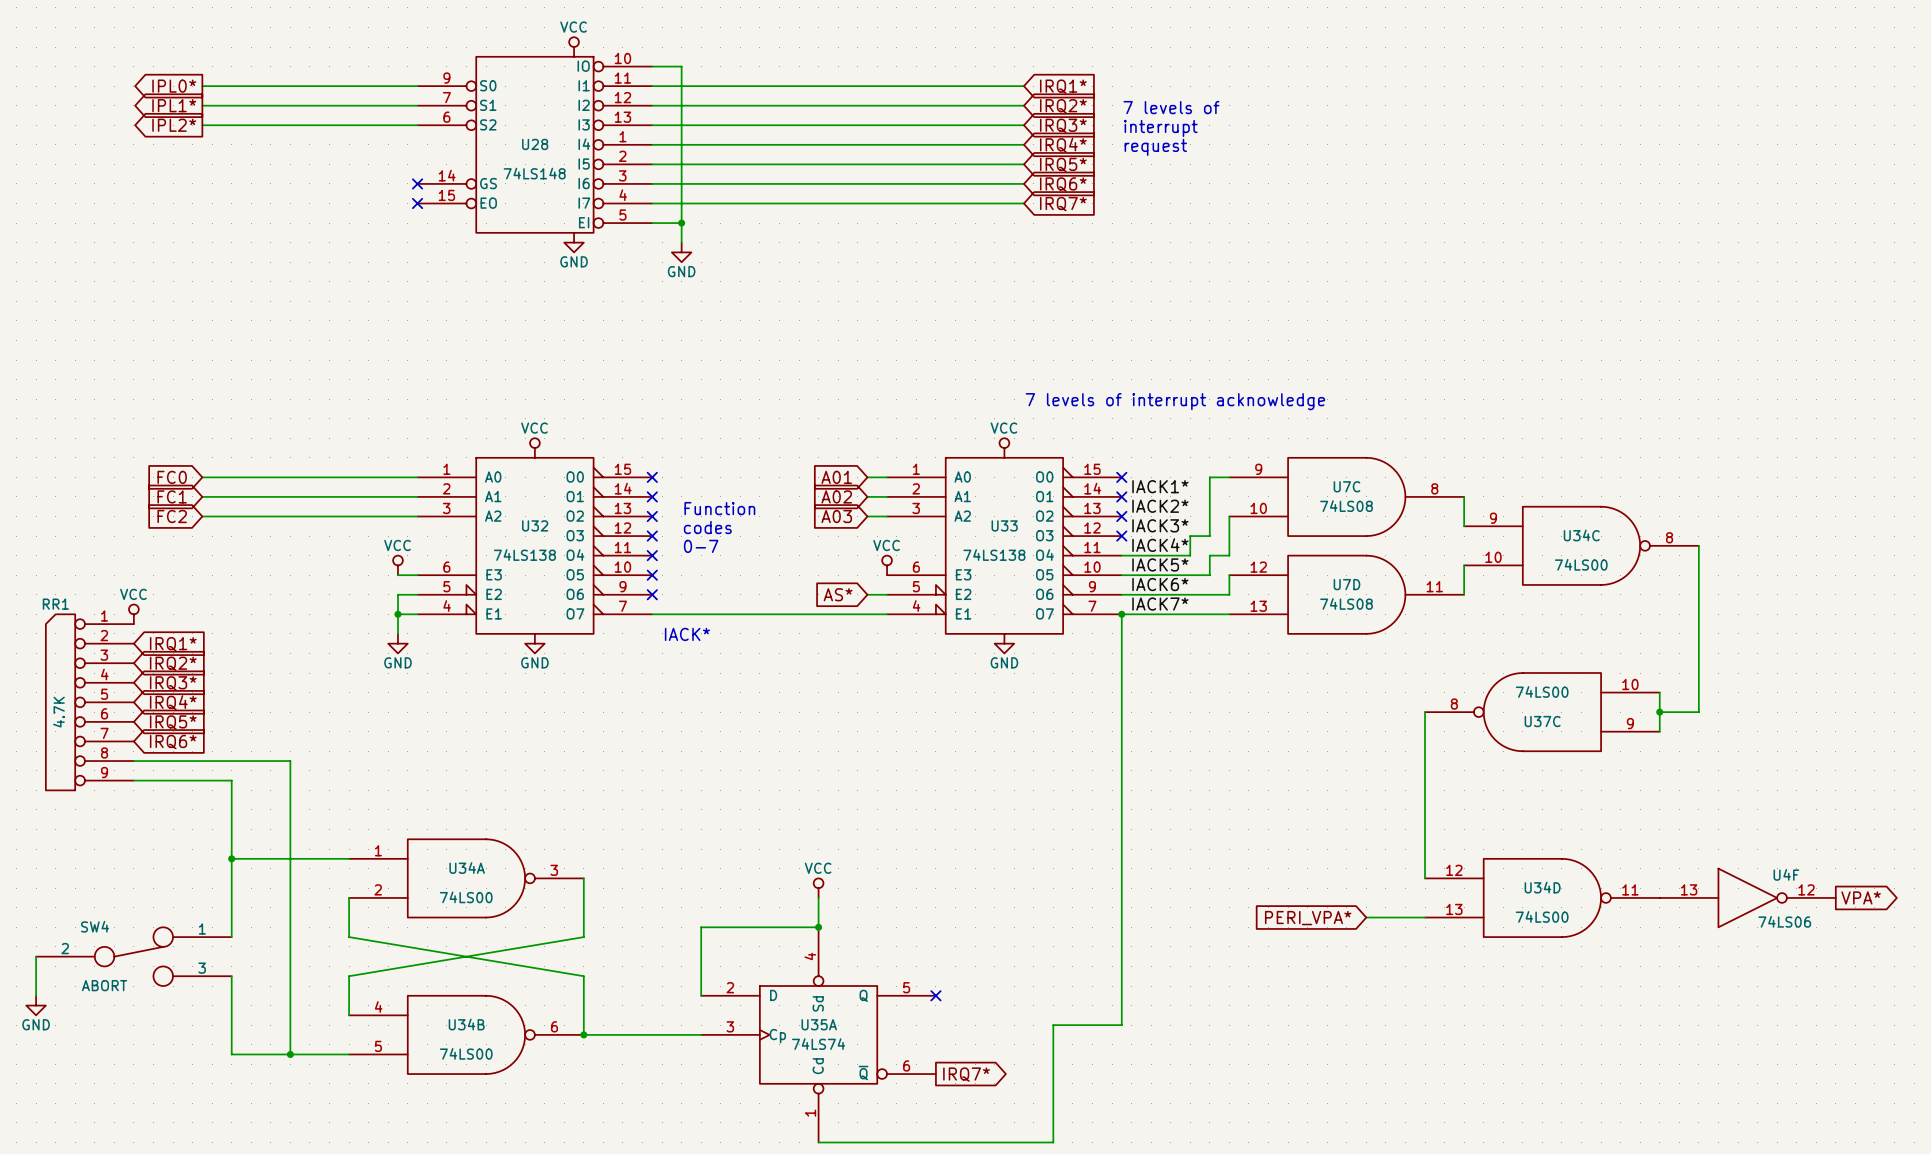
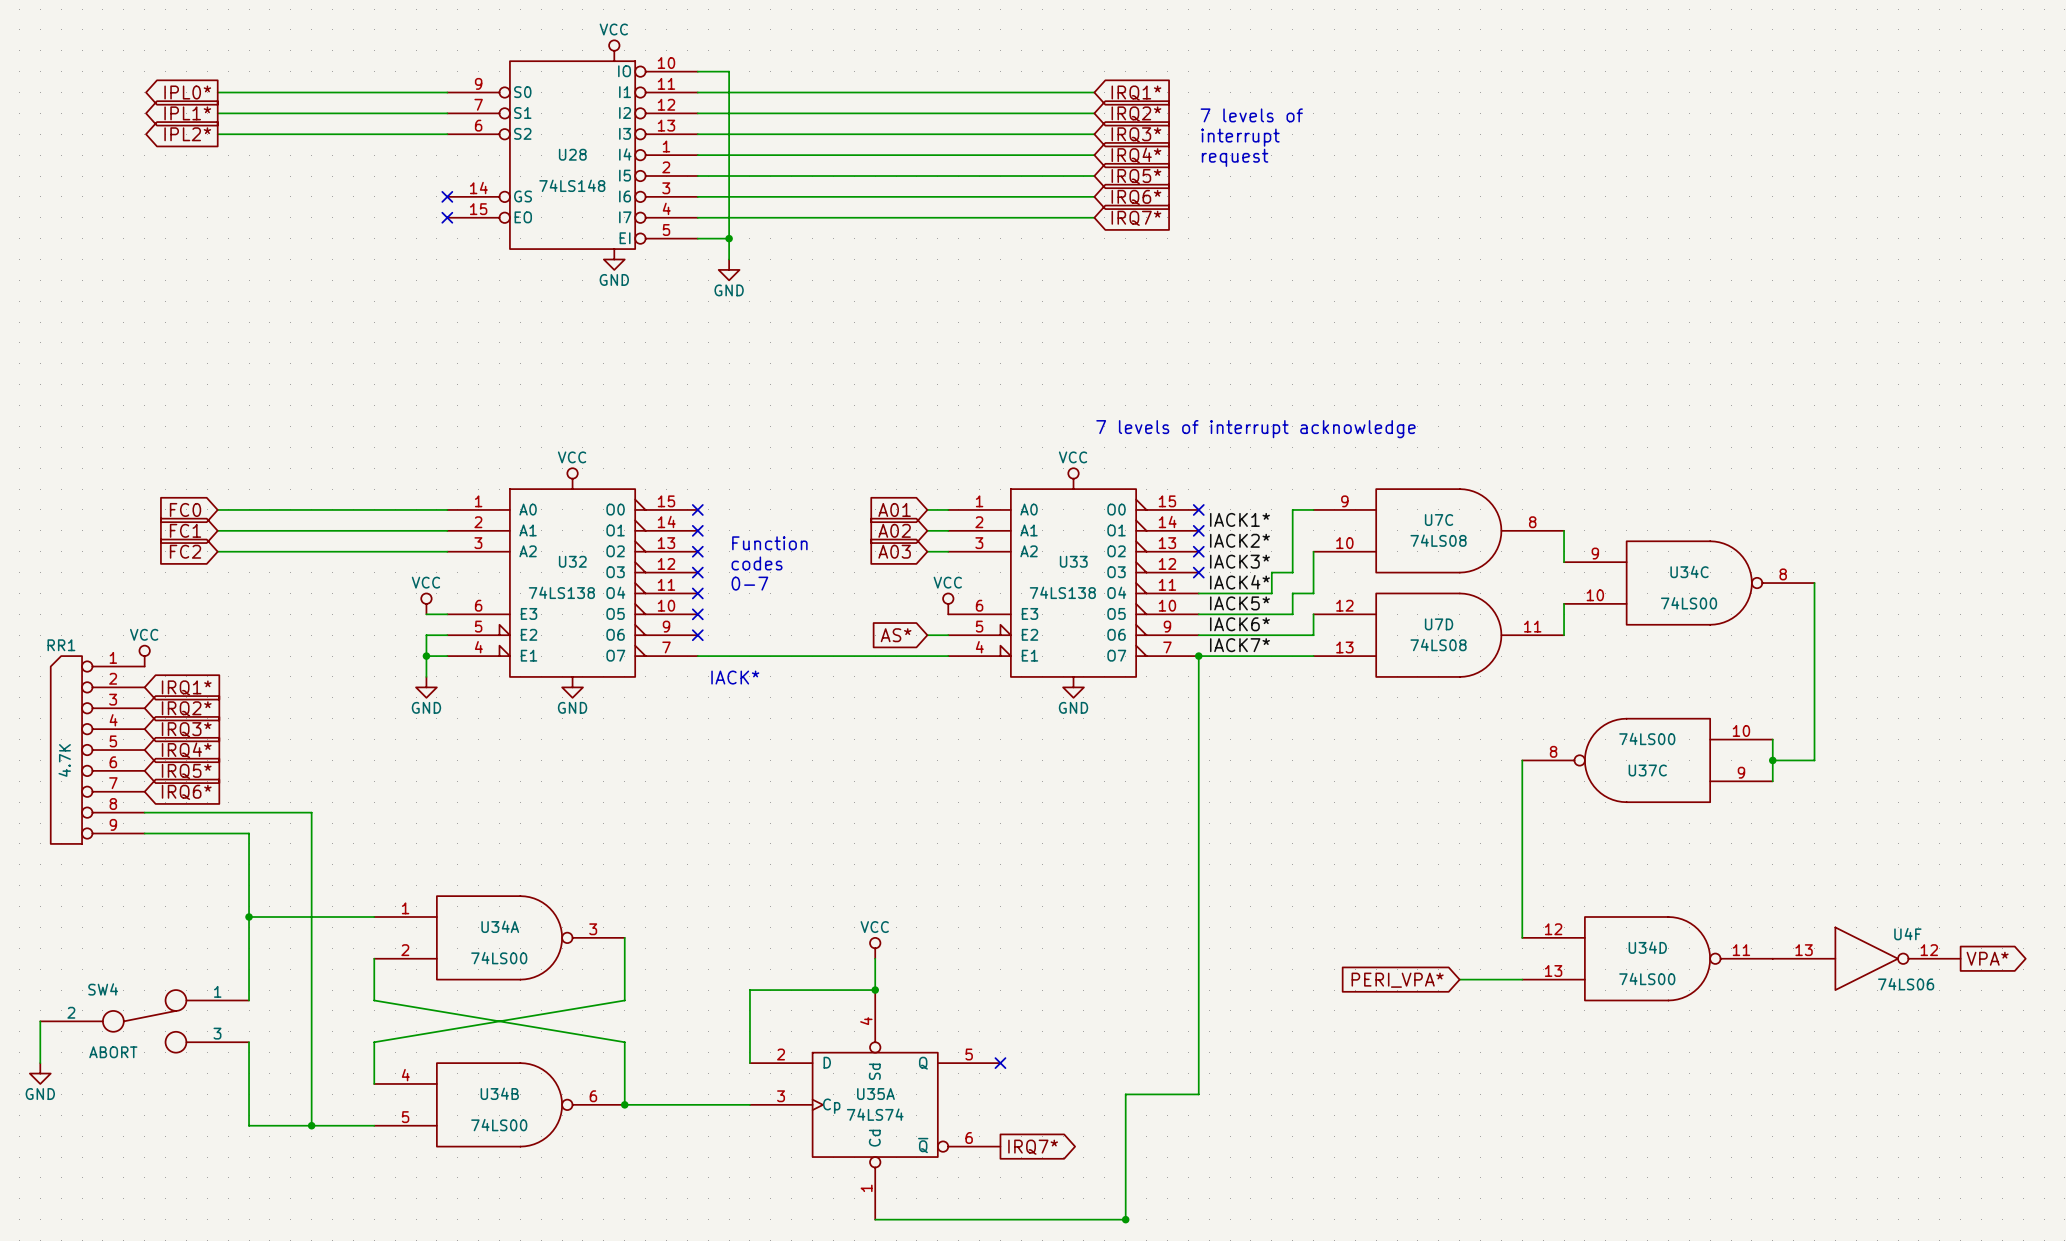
junction: none -> (1125, 1219)

